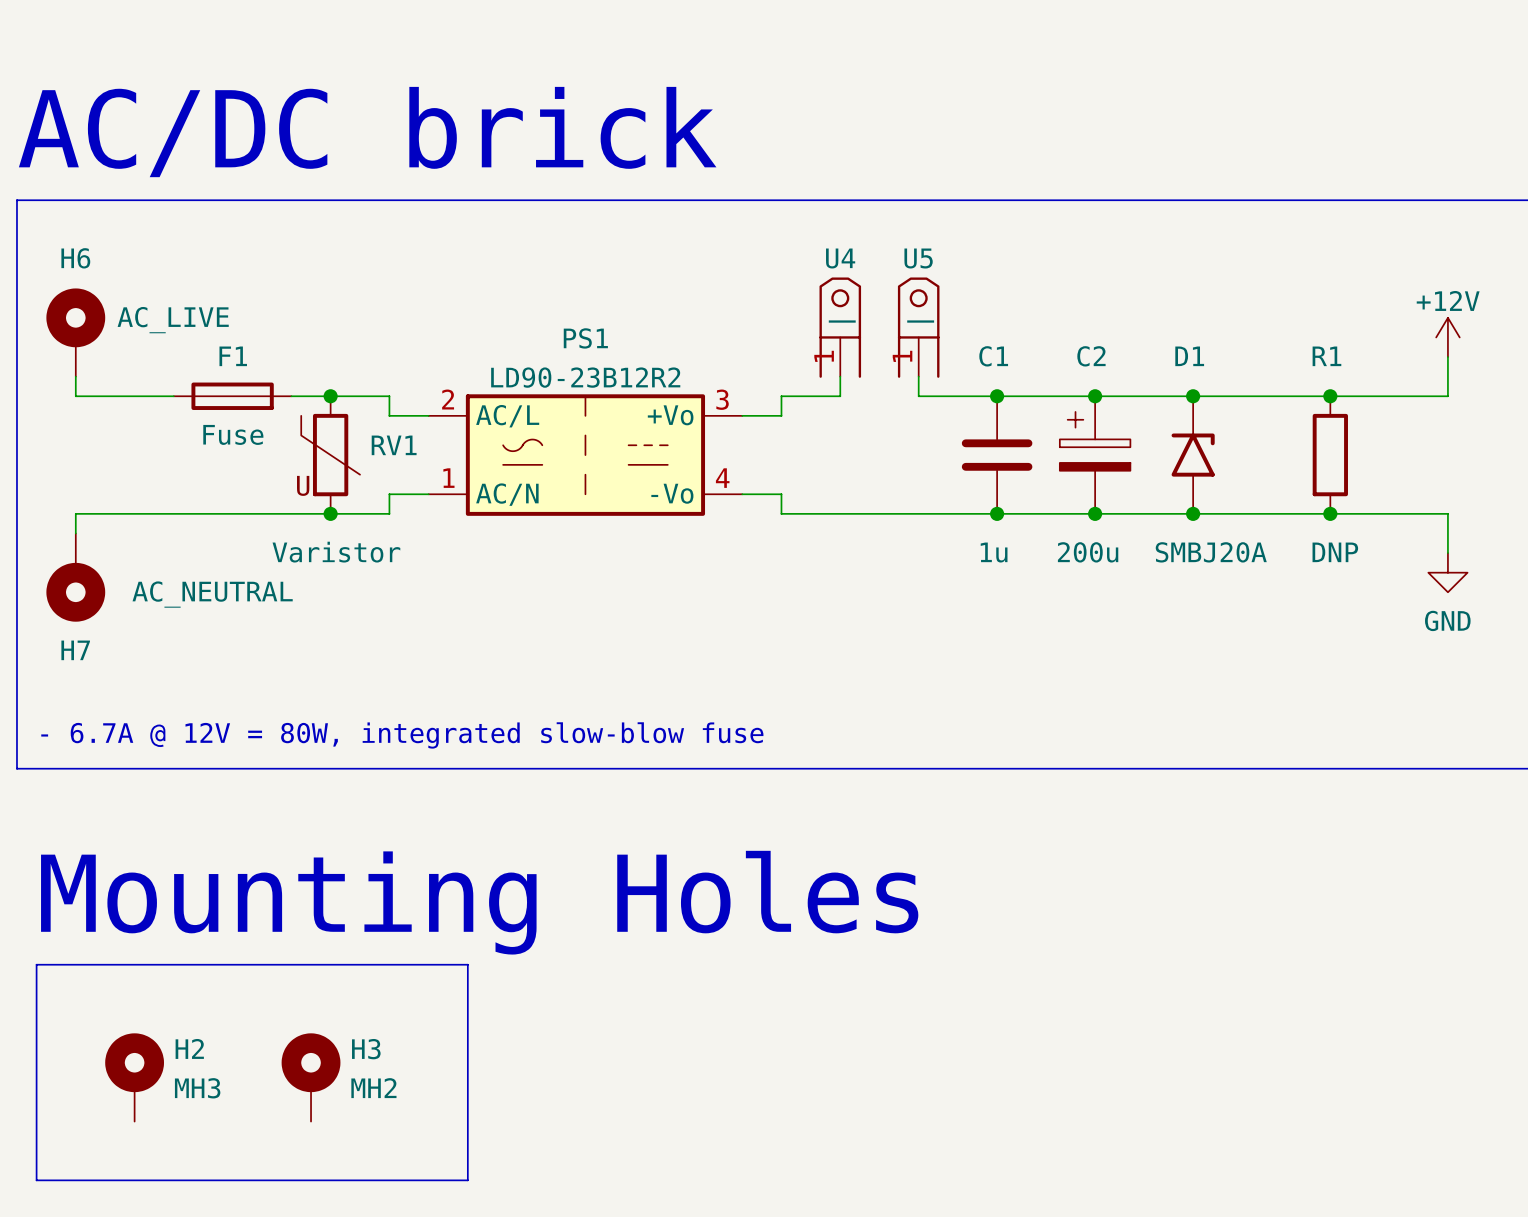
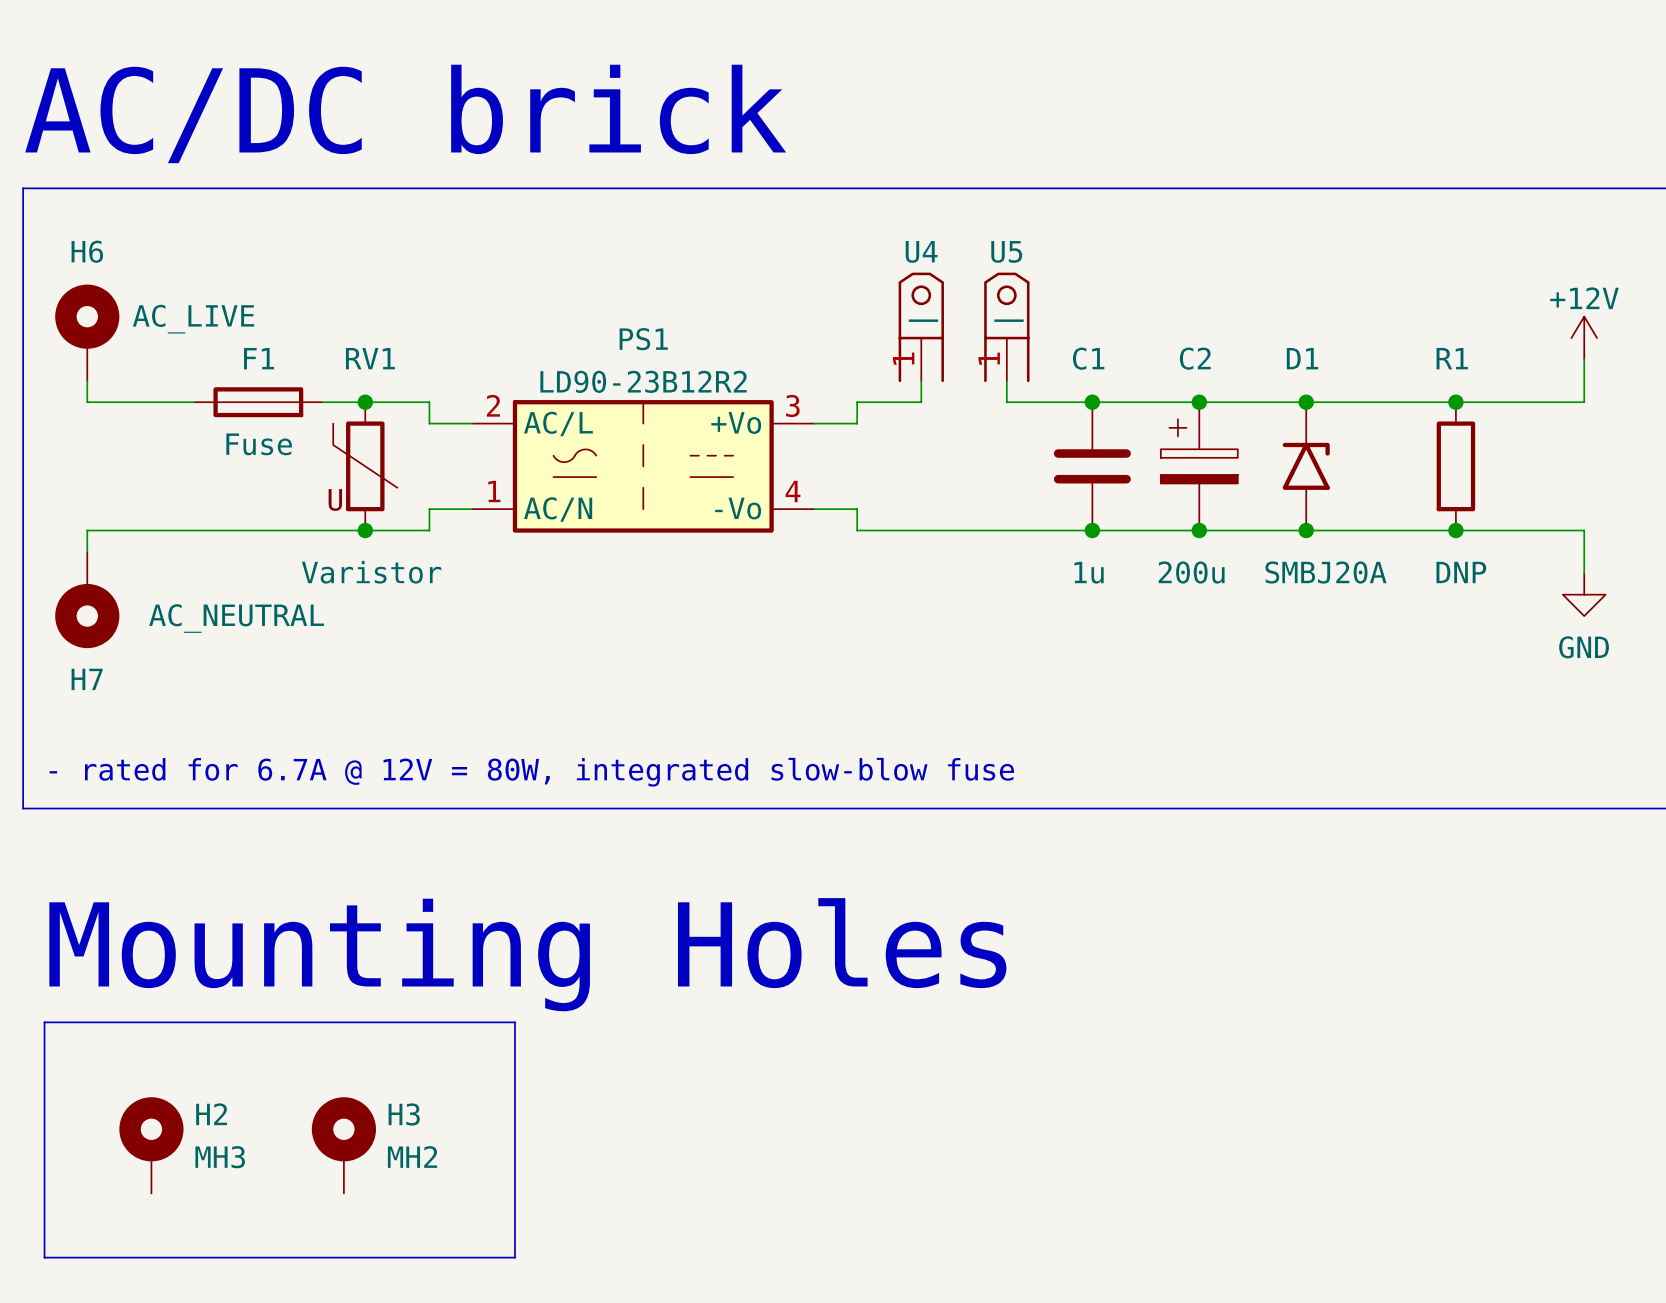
RV1 name position: RV1 (394, 445) -> RV1 (370, 358)
text: - 6.7A @ 12V = 80W, integrated slow-blow fuse (402, 735) -> - rated for 6.7A @ 12V = 80W, integrated slow-blow fuse (531, 772)

